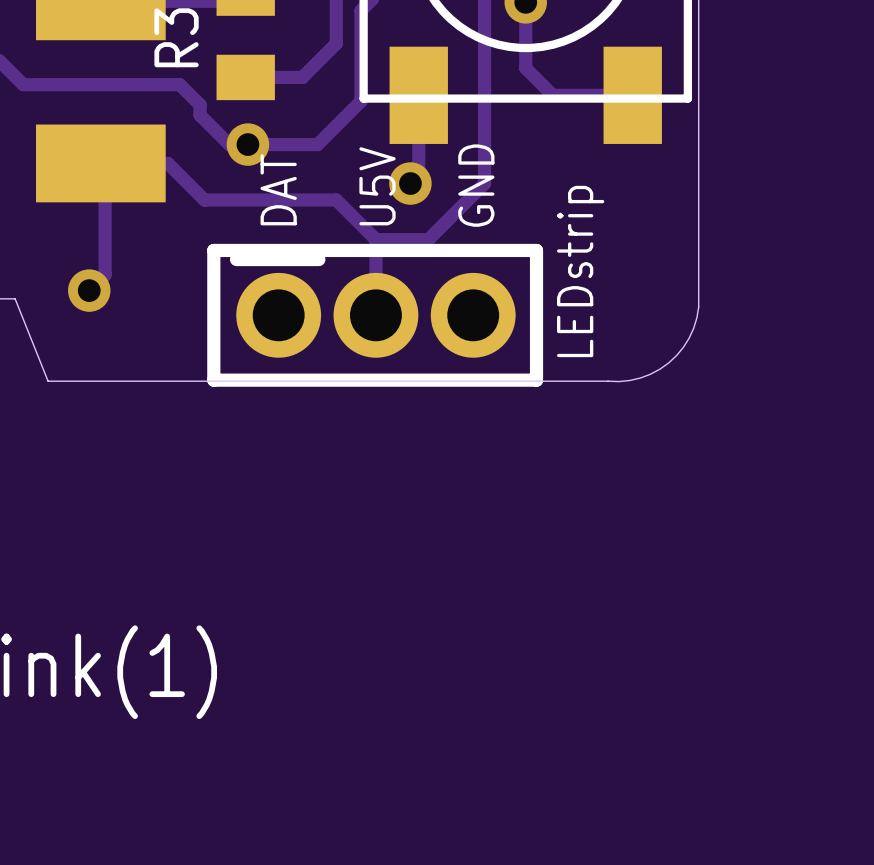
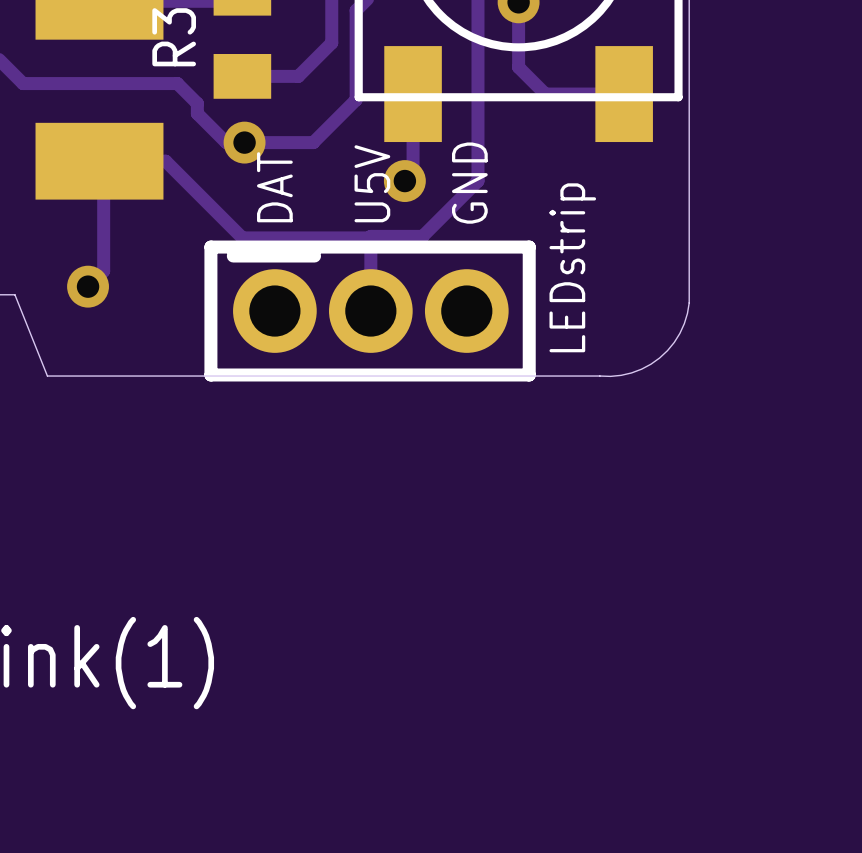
track: (204, 200) (336, 200) (375, 239) -> (201, 197) (242, 237) (370, 237)

